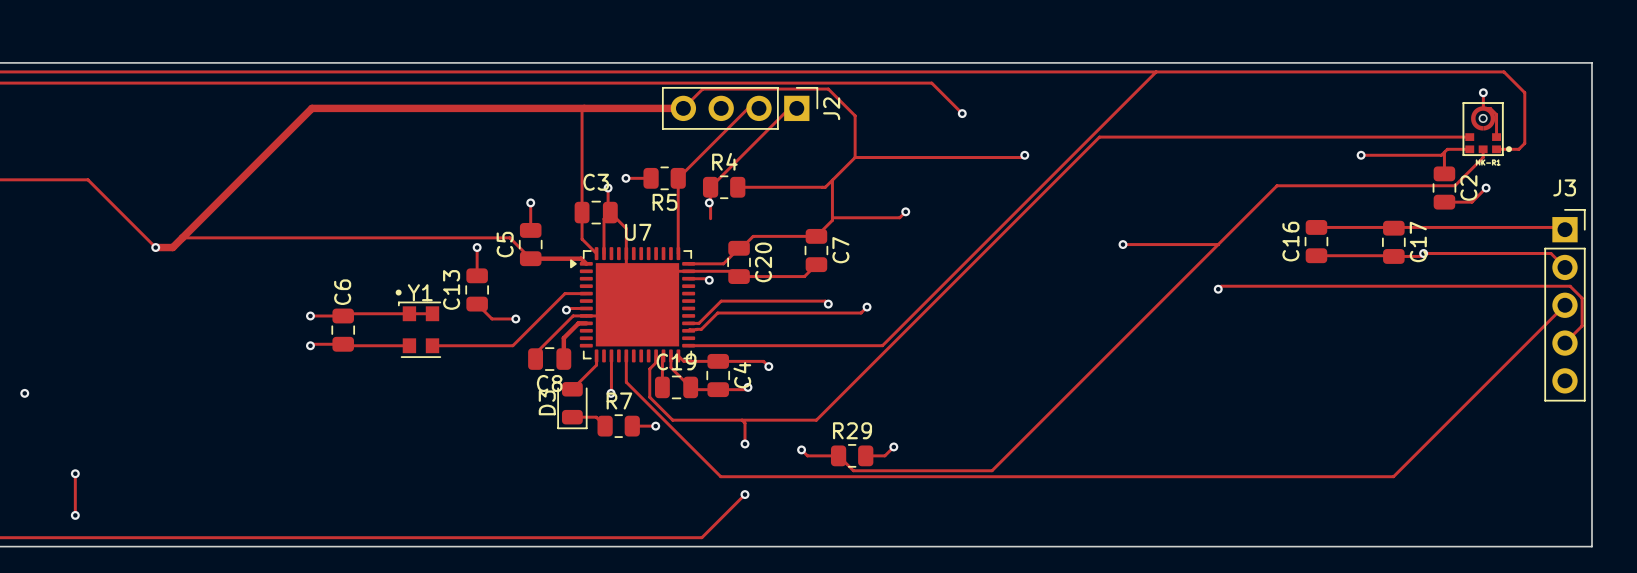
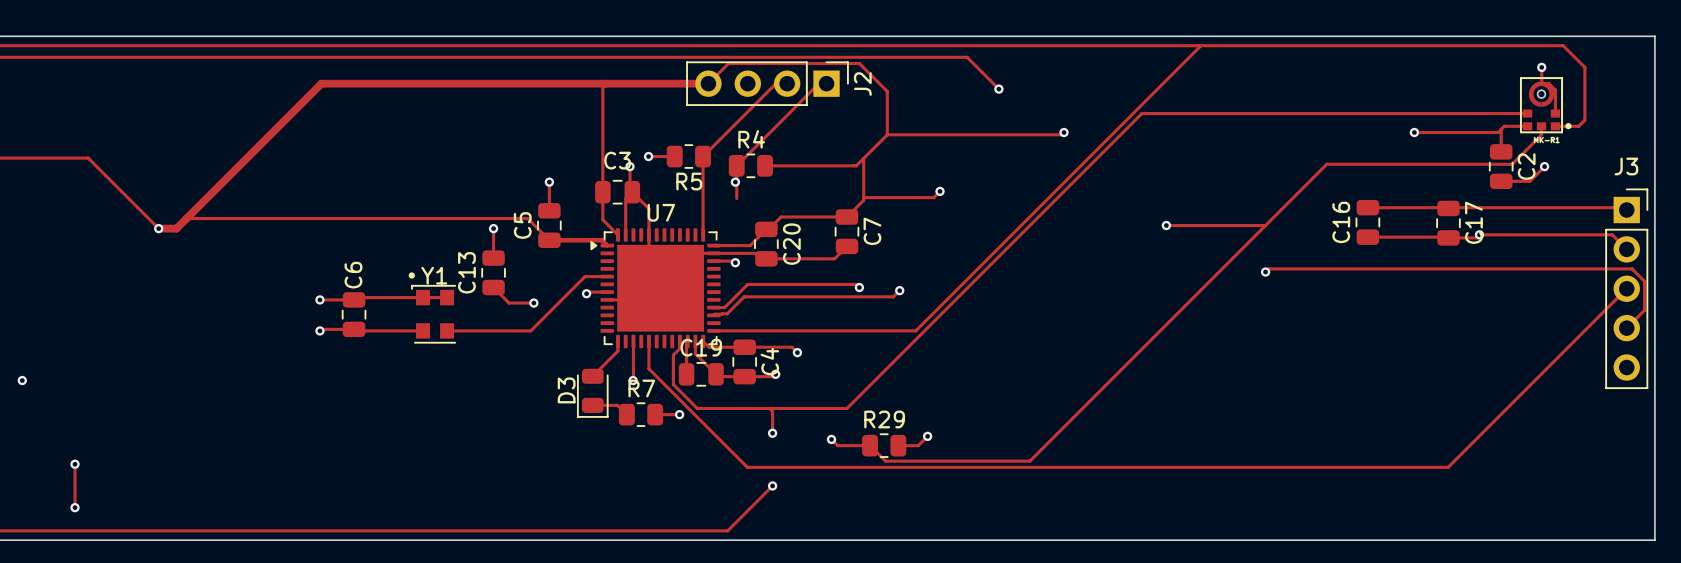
track: (586, 315) (573, 315) (535, 353) (535, 359) -> none
track: (586, 323) (578, 323) (563, 338) (563, 359) -> none
C8: (549, 359) -> none

